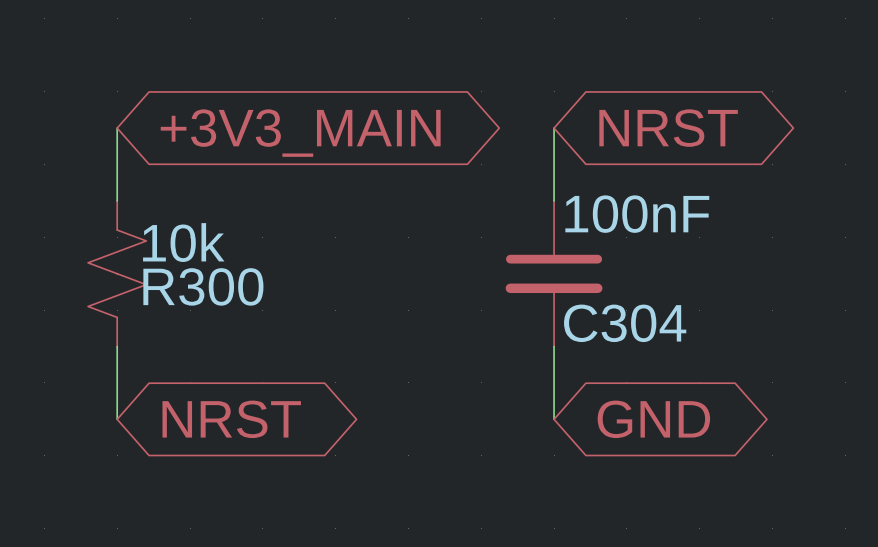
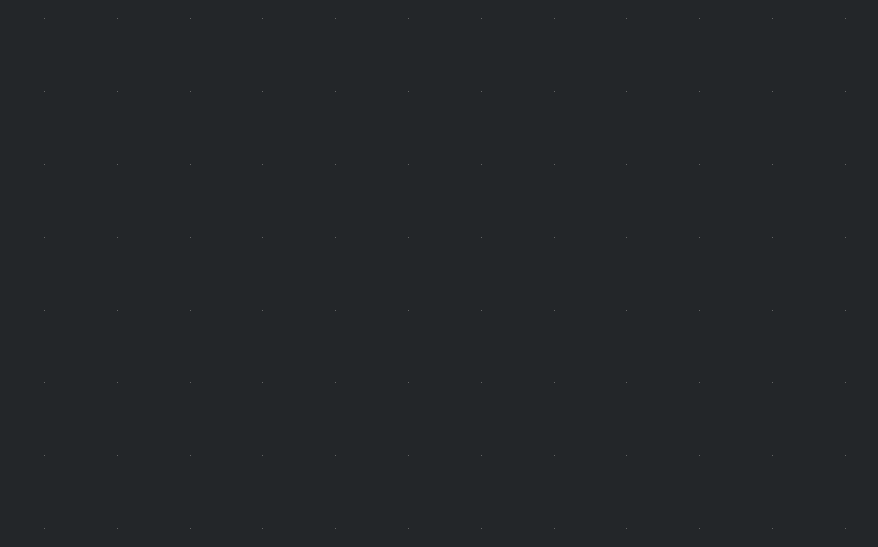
wire: (117, 128) (117, 200) -> none
wire: (554, 128) (554, 200) -> none
global label: NRST (668, 128) -> none
global label: +3V3_MAIN (300, 133) -> none
R300: 10k (117, 273) -> none
C304: 100nF (554, 273) -> none
wire: (117, 346) (117, 419) -> none
wire: (554, 346) (554, 419) -> none
global label: NRST (231, 419) -> none
global label: GND (653, 419) -> none

